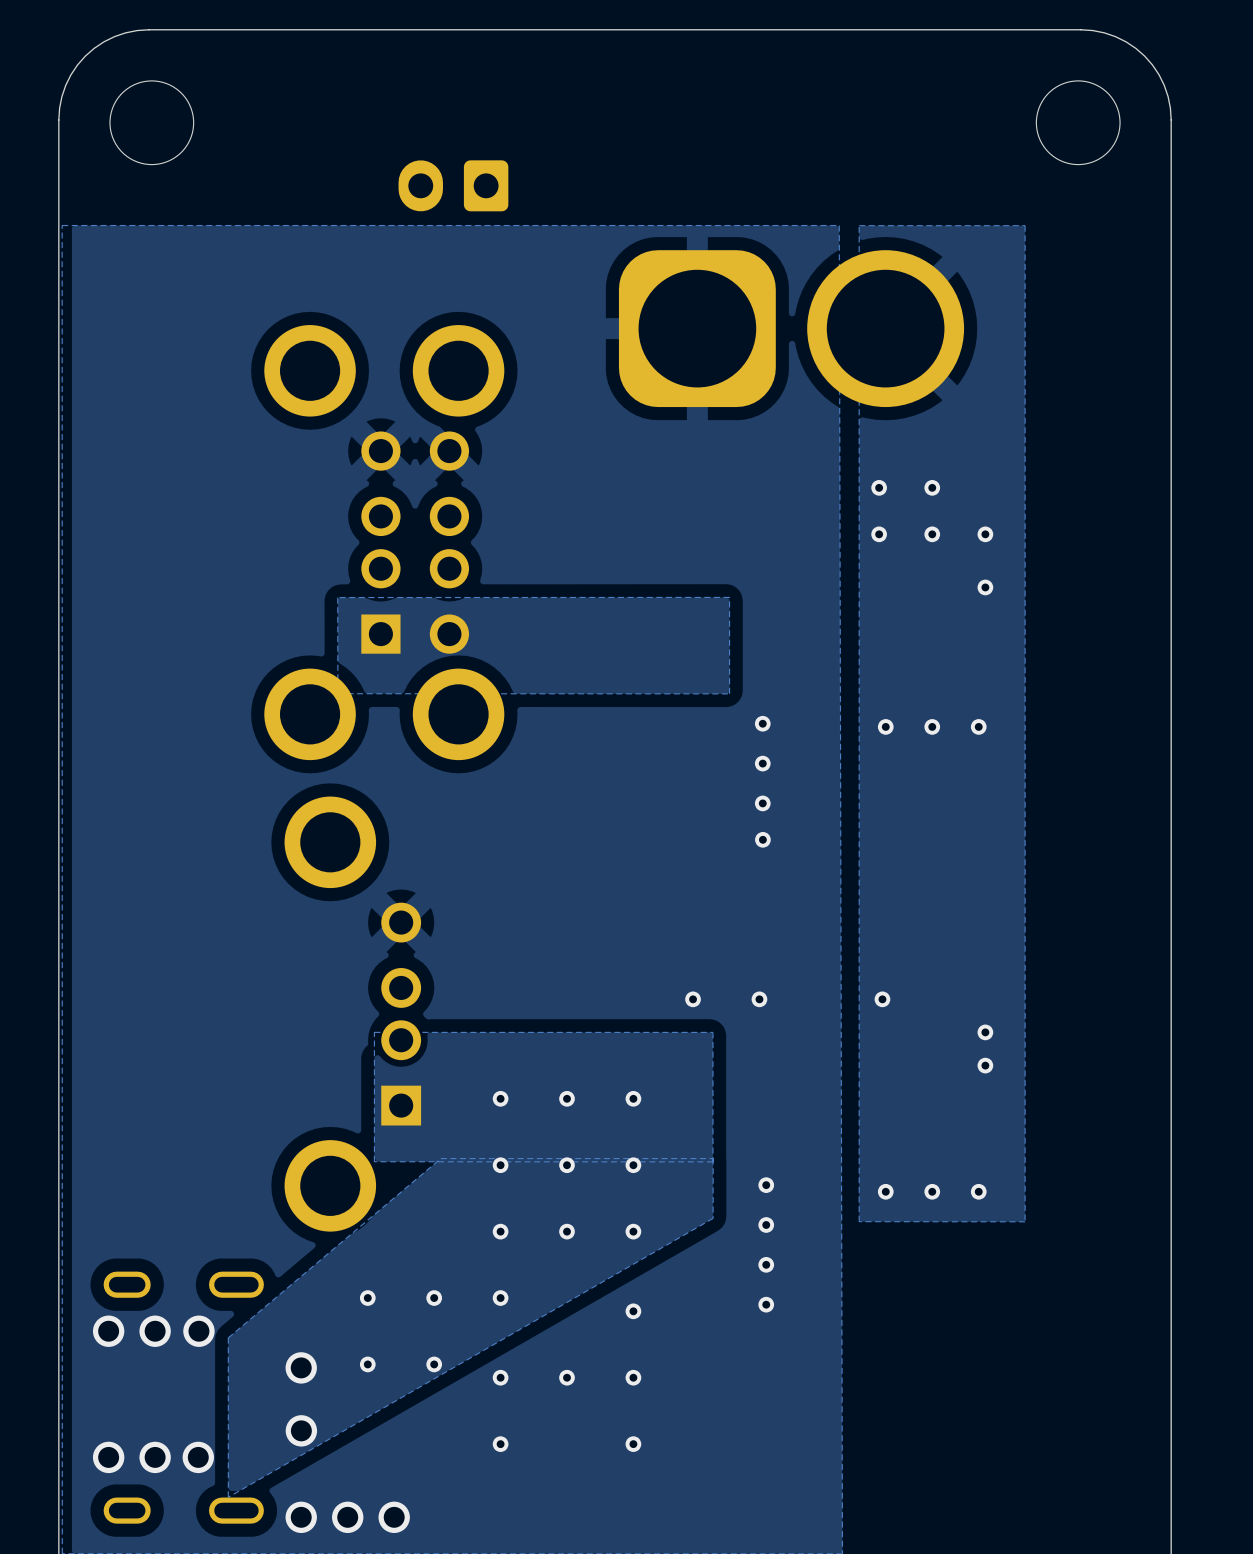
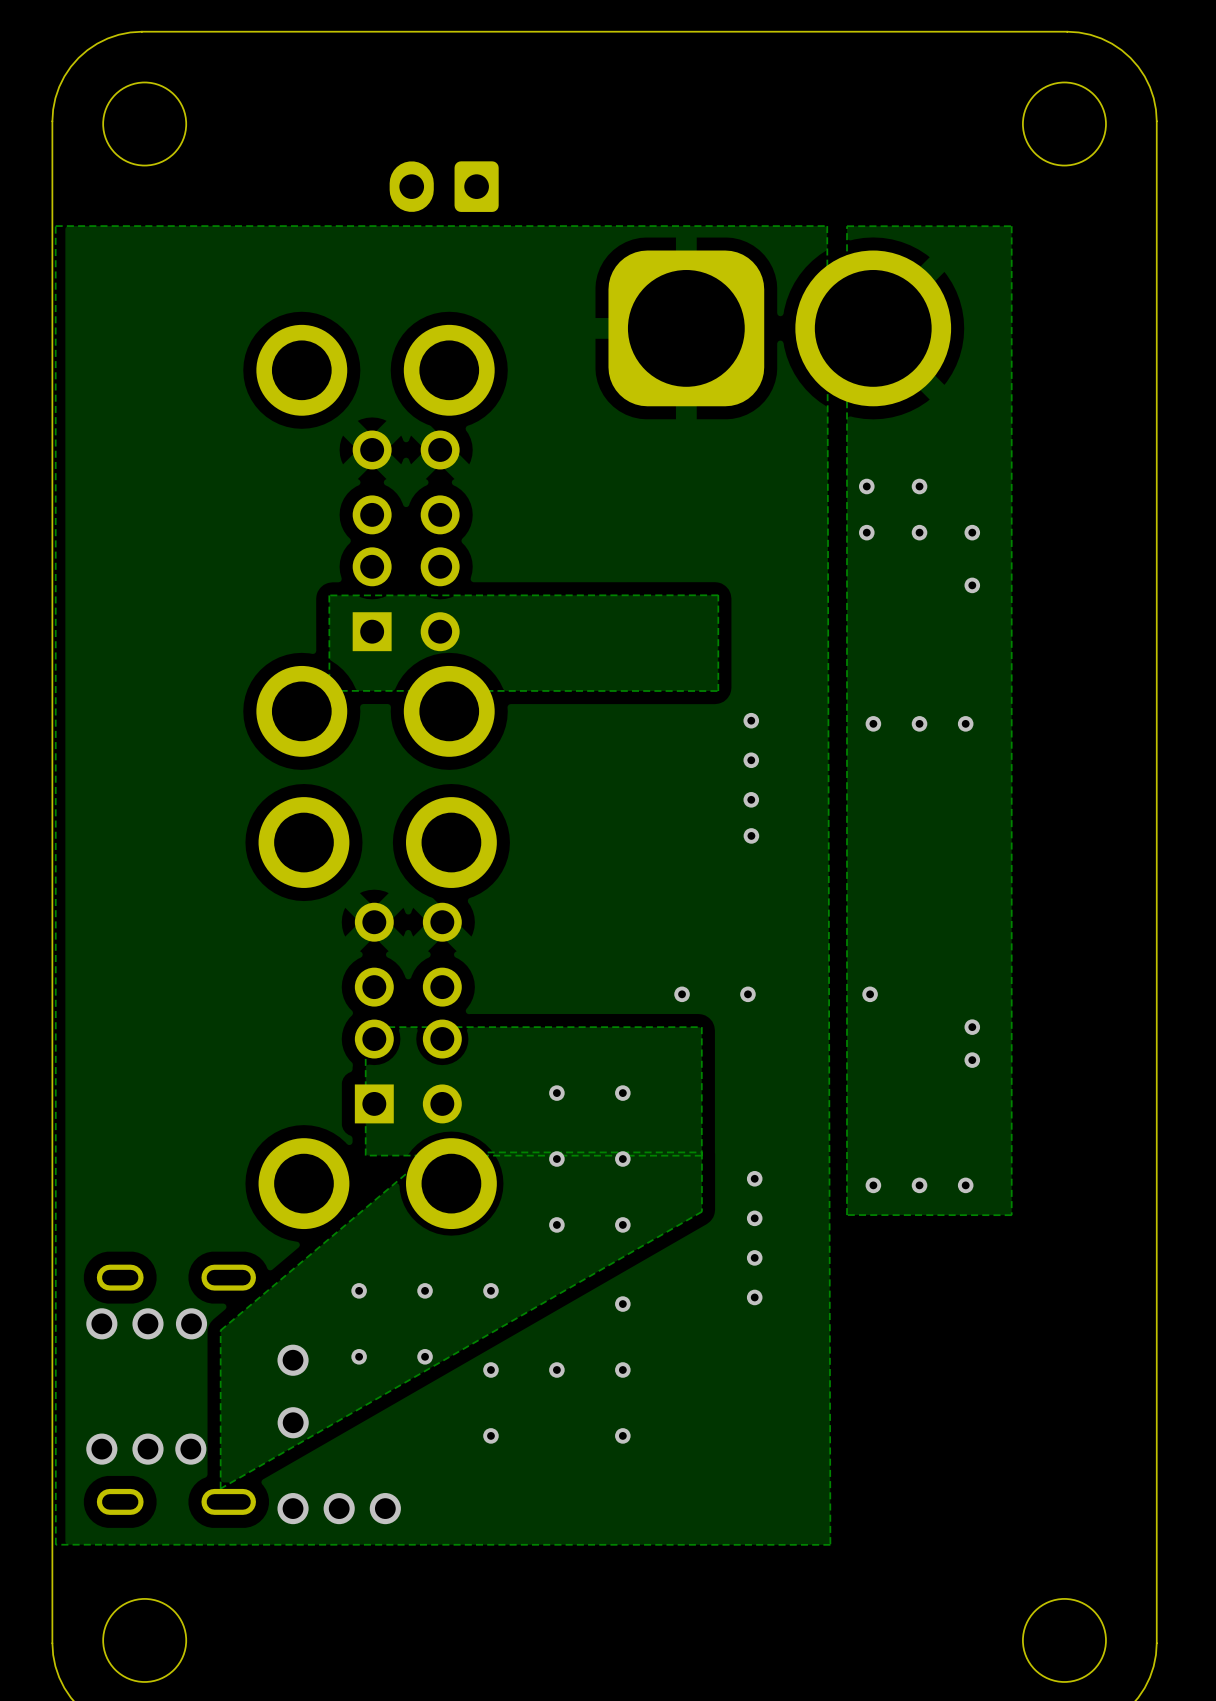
part: (352, 1014) -> none
part: none -> (377, 1013)
via: (500, 1098) -> none
via: (500, 1165) -> none
via: (500, 1231) -> none

